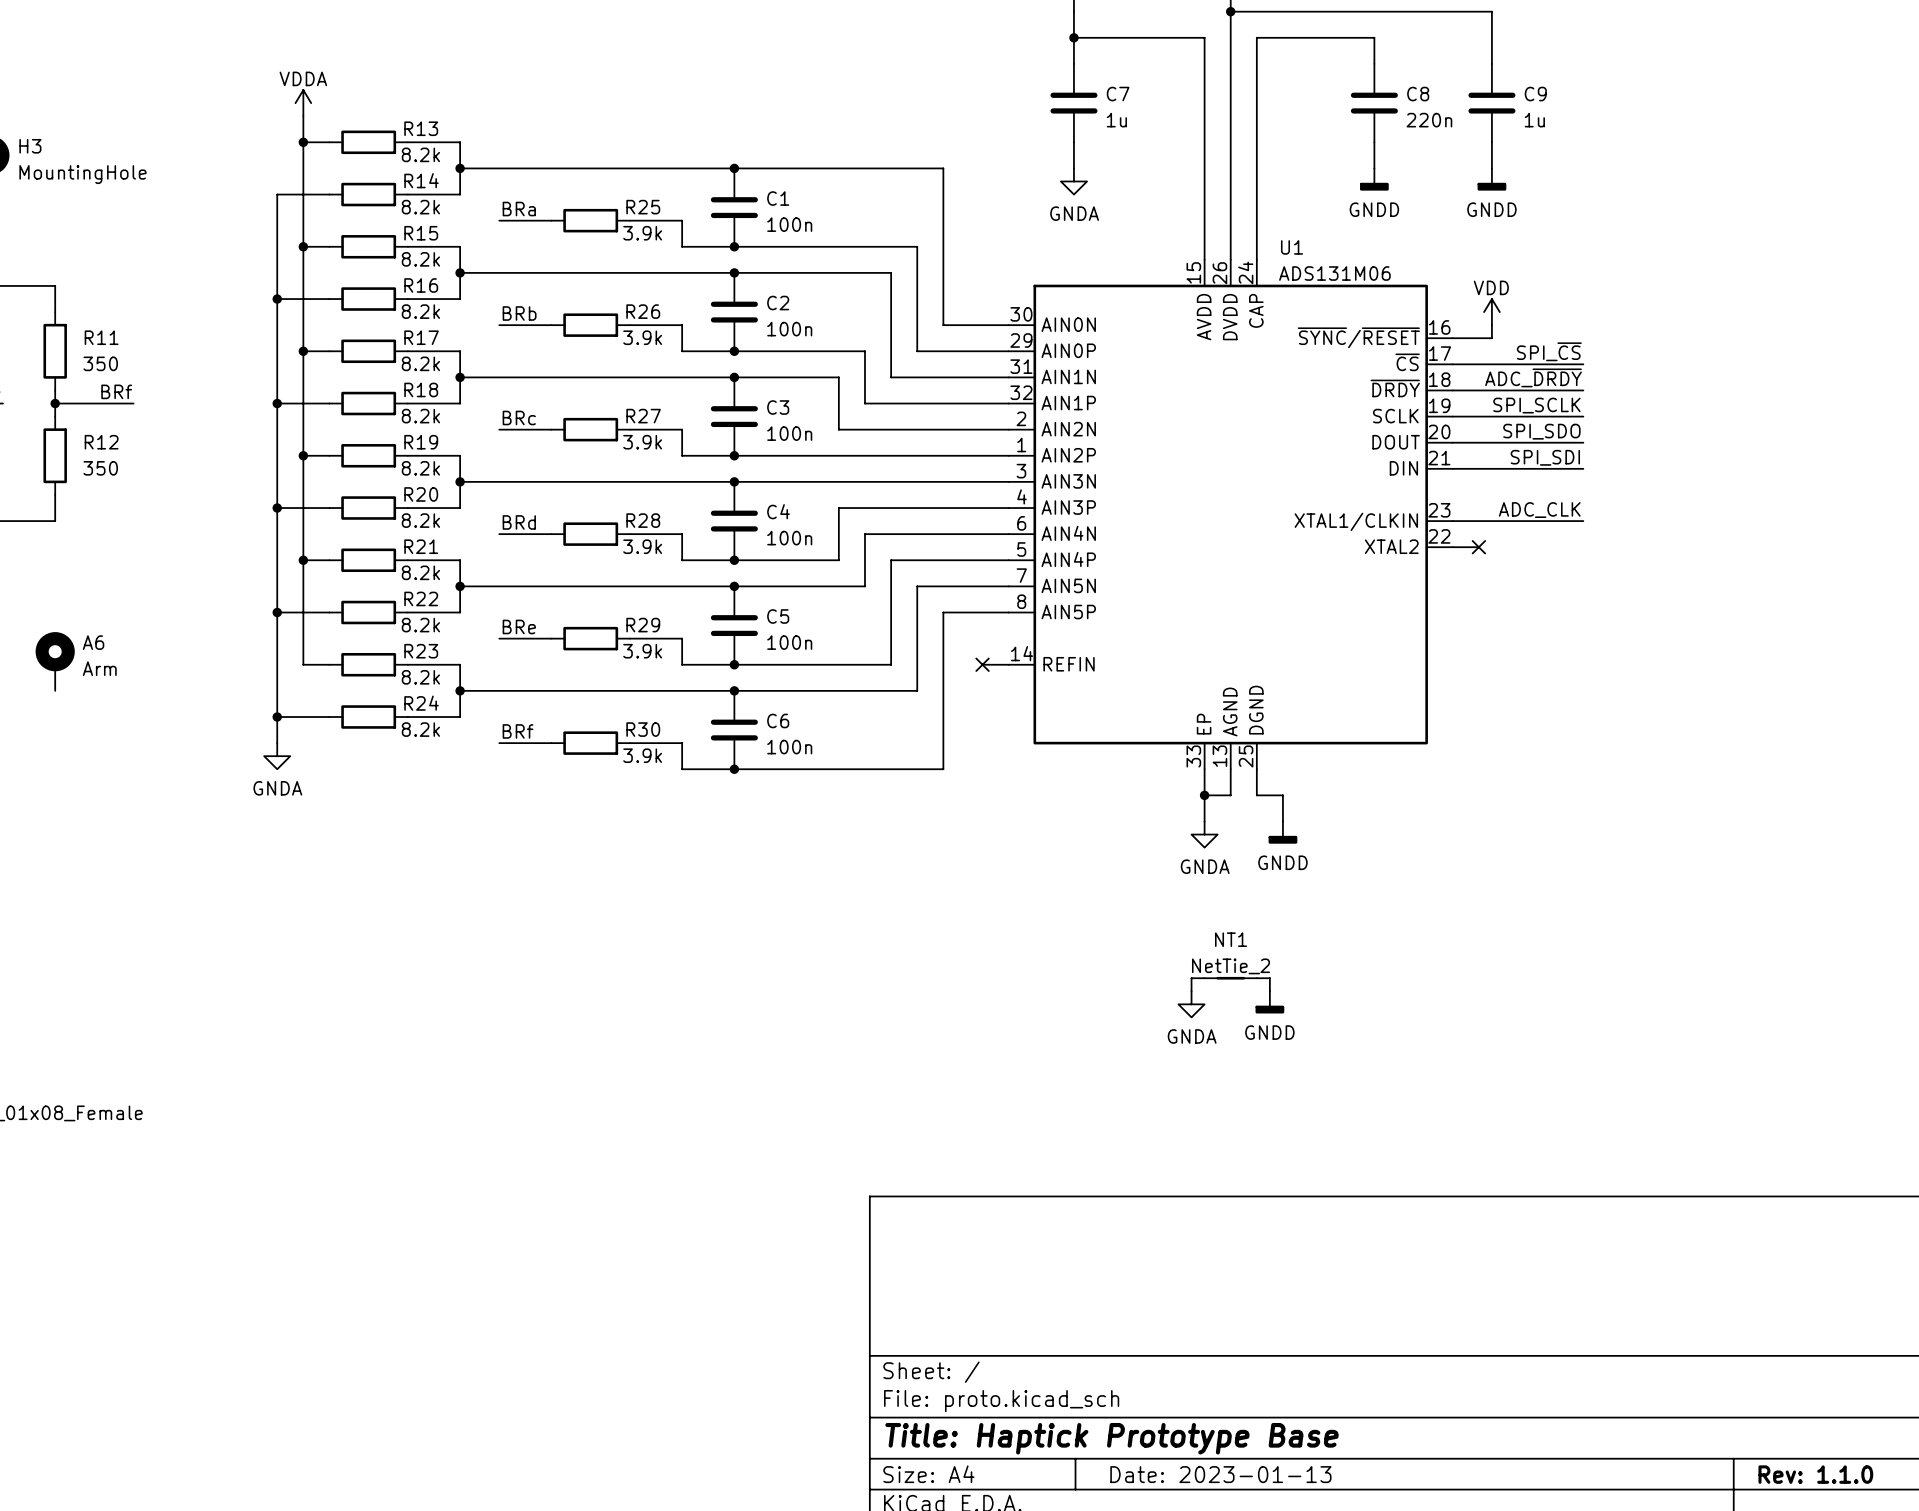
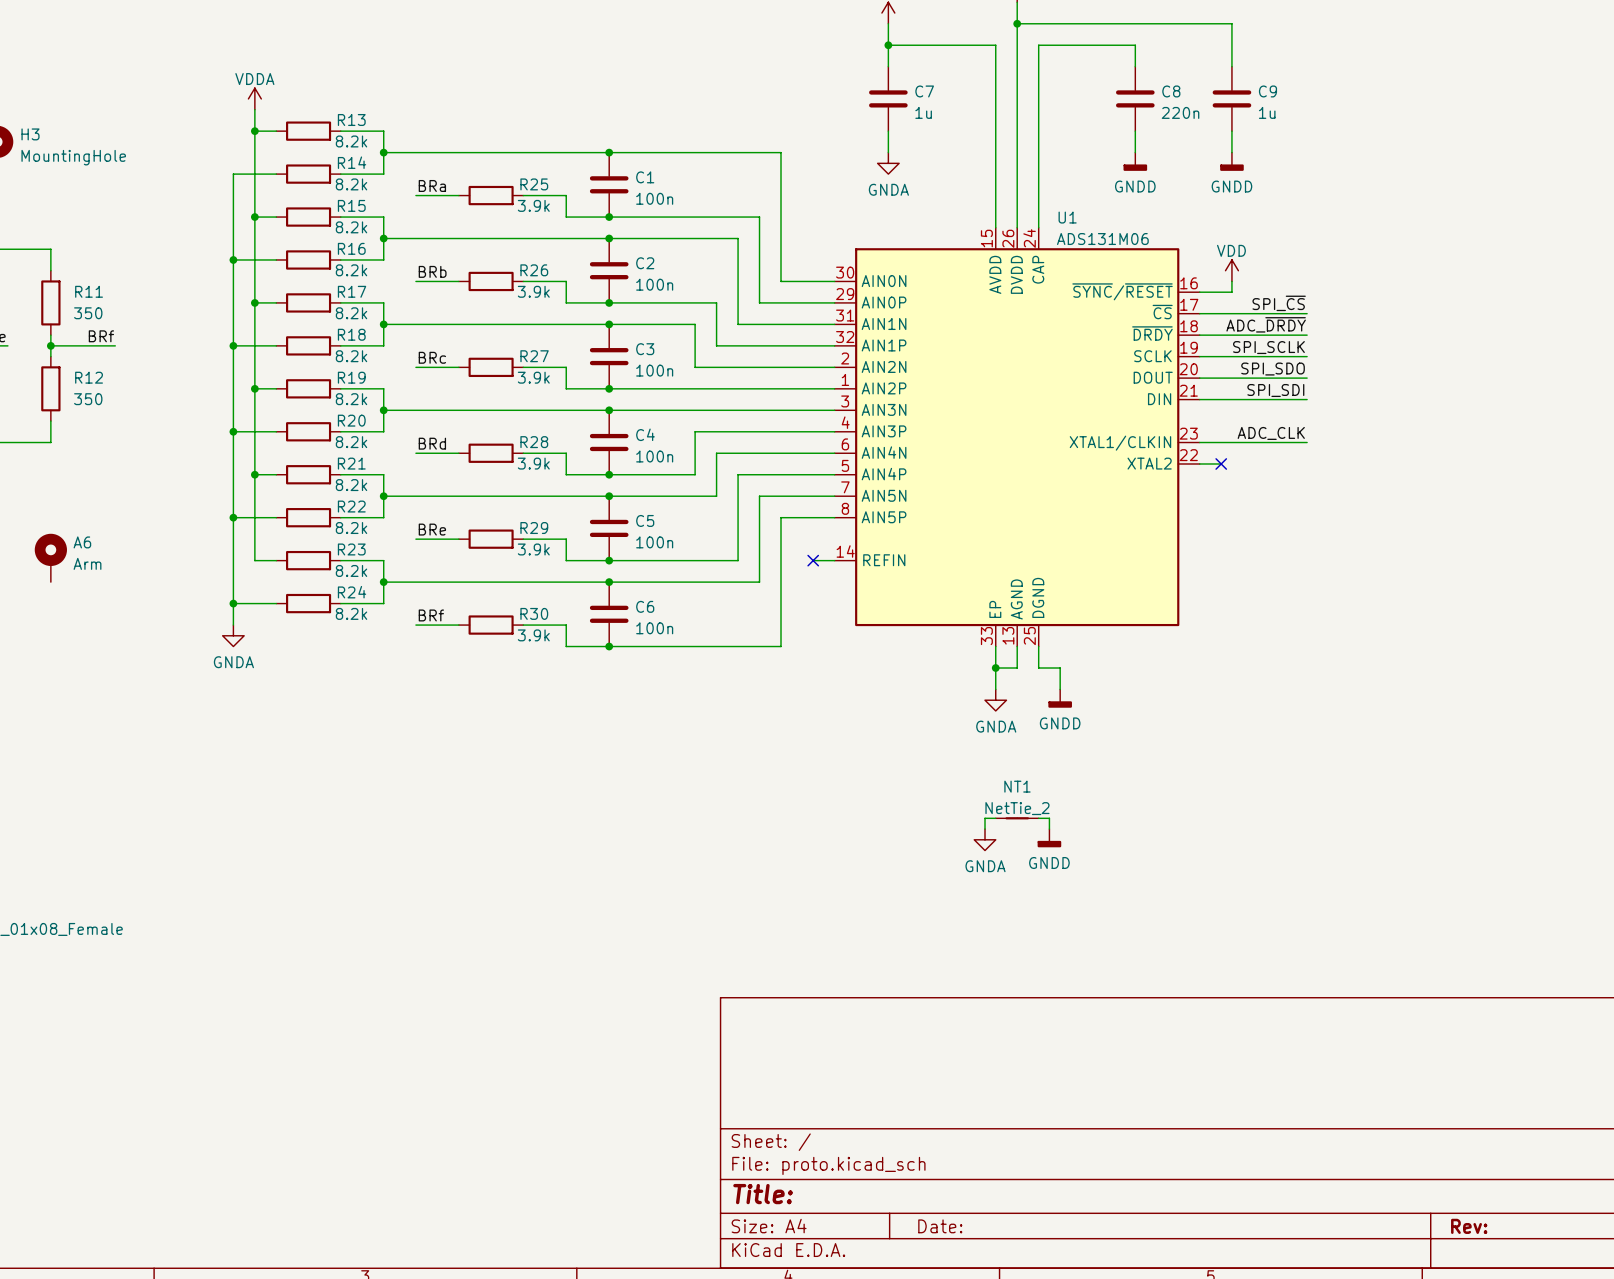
title block: Title: Haptick Prototype Base (1112, 1438) -> Title: (763, 1194)
title block: Date: 2023-01-13 (1220, 1474) -> Date: (940, 1226)
title block: Rev: 1.1.0 (1815, 1474) -> Rev: (1469, 1226)

